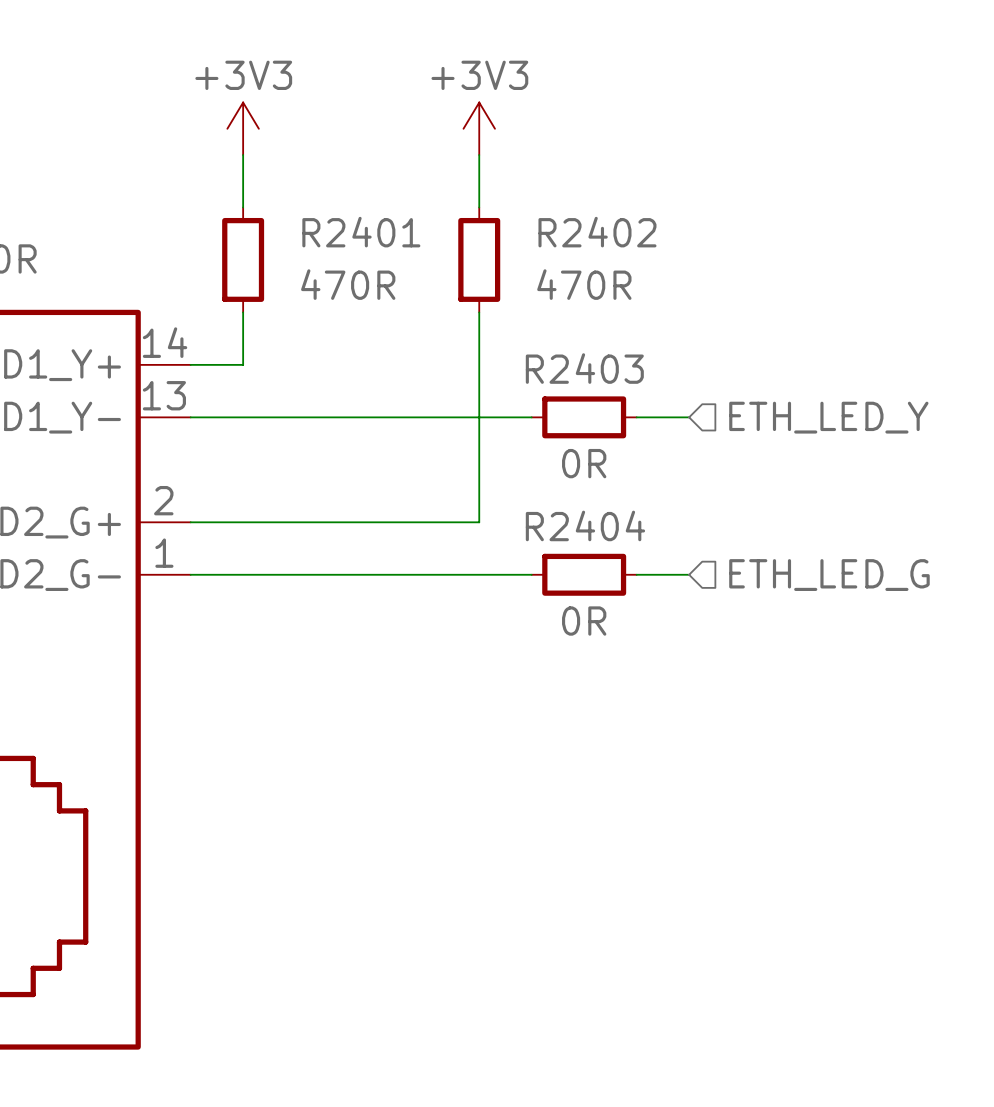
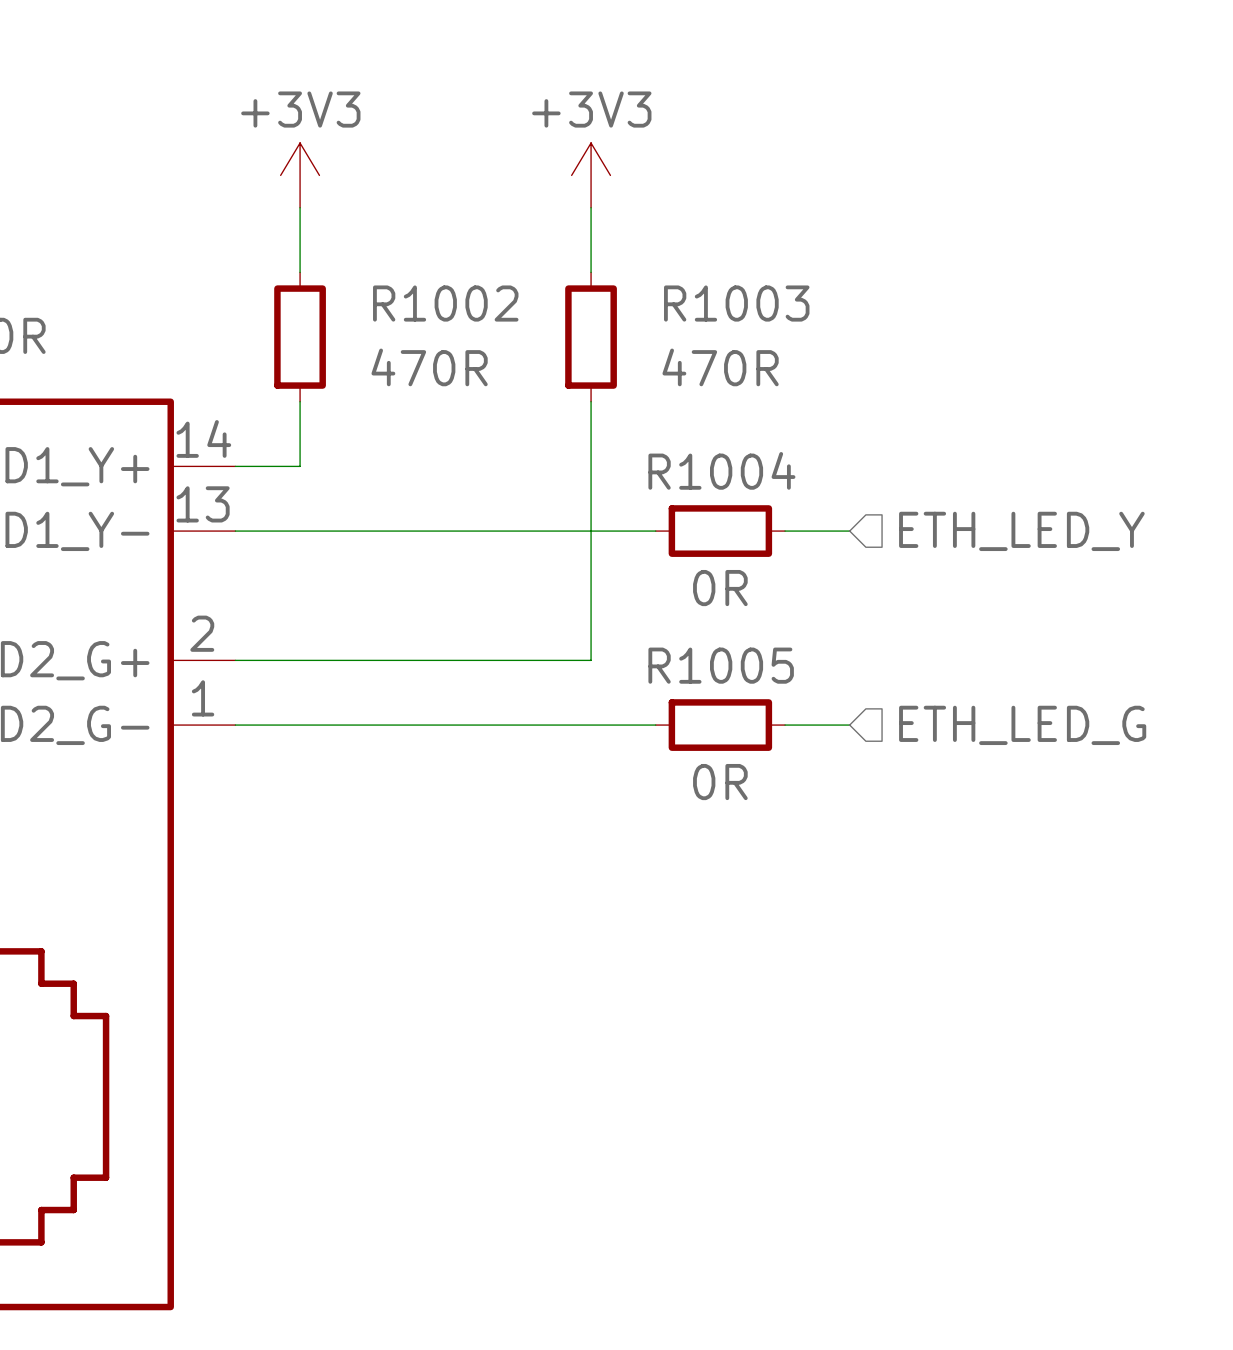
R2401 name: R2401 (361, 232) -> R1002 (445, 303)
R2402 name: R2402 (597, 232) -> R1003 (736, 303)
R2403 name: R2403 (584, 368) -> R1004 (721, 470)
R2404 name: R2404 (585, 525) -> R1005 (721, 665)

